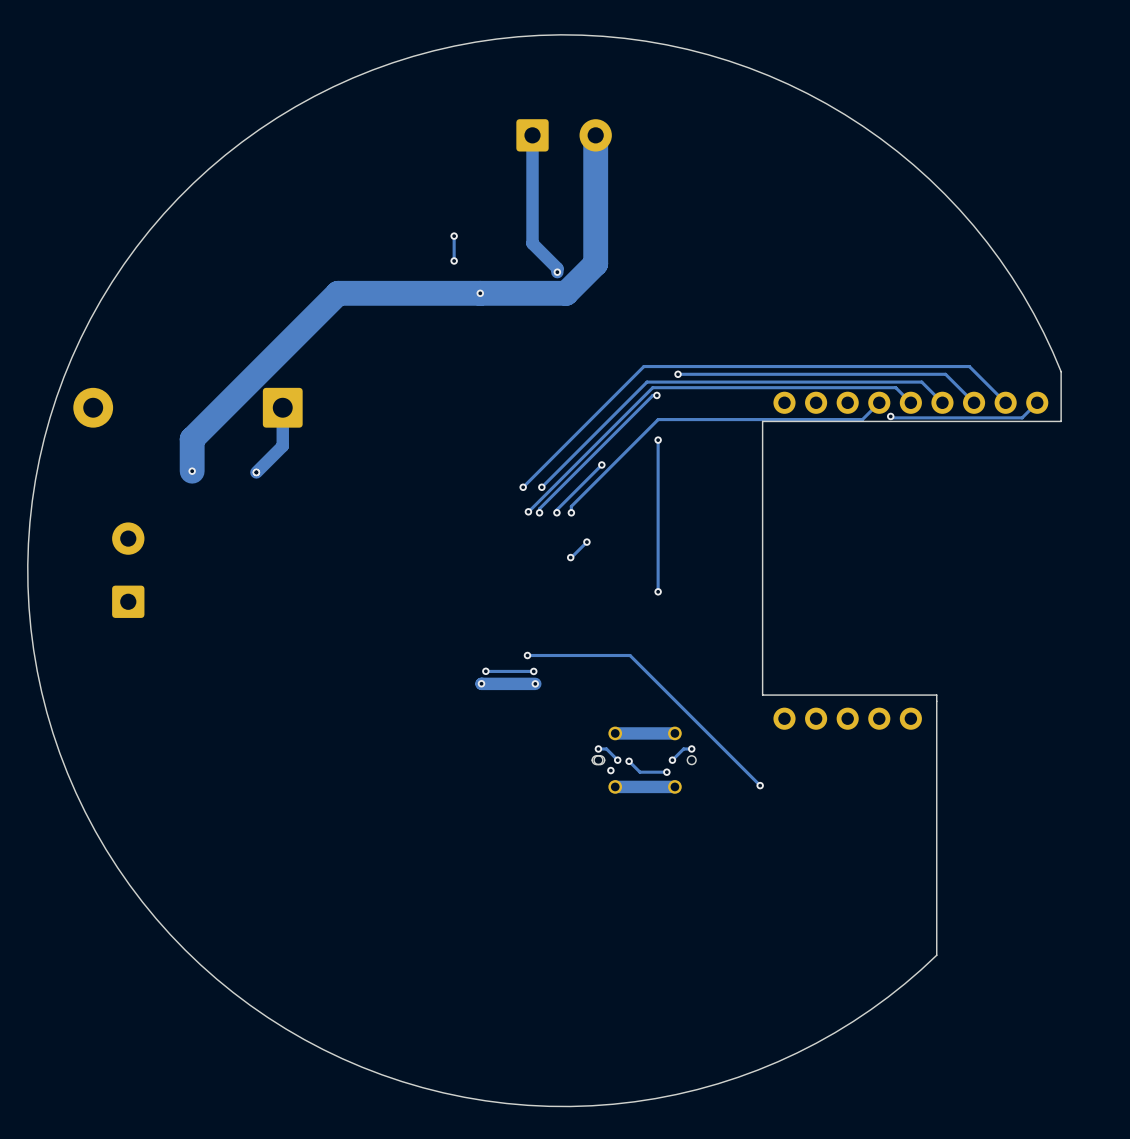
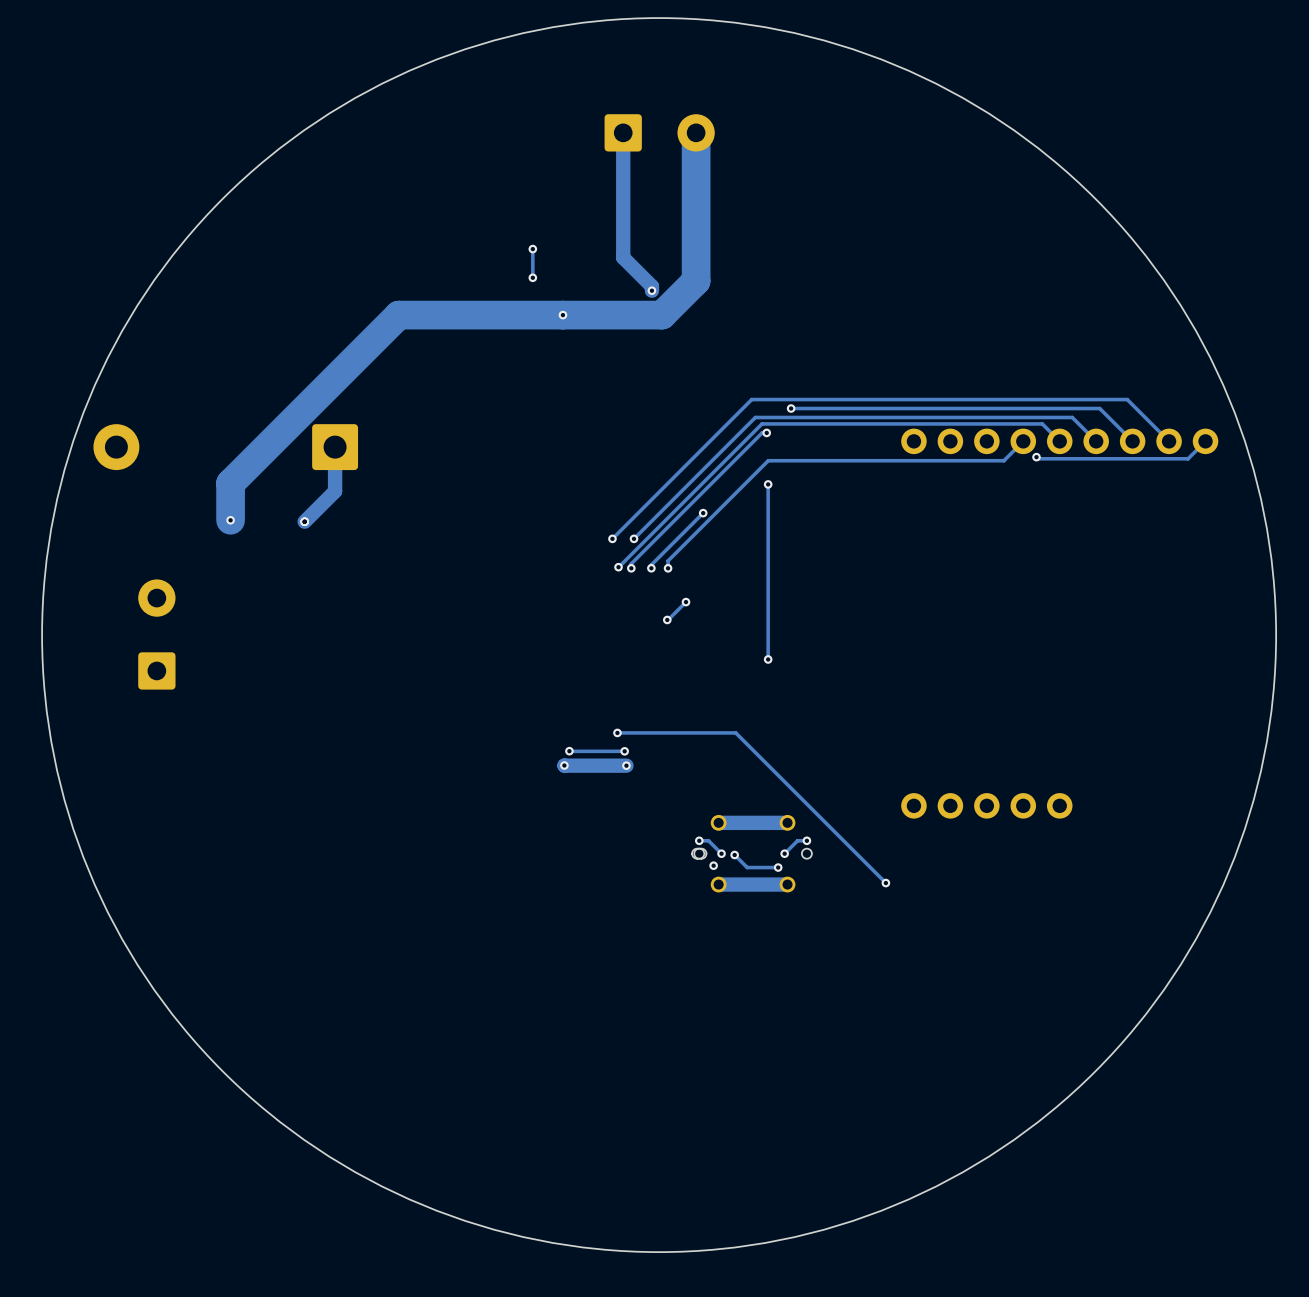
round board edge: none -> [41, 17, 1277, 1253]
board edge: (1061, 371) (1061, 421) (762, 421) (762, 695) (936, 695) (936, 955) (888, 997) (853, 1021) (797, 1052) (758, 1069) (717, 1083) (655, 1098) (613, 1104) (549, 1106) (506, 1103) (464, 1097) (402, 1081) (362, 1067) (323, 1049) (267, 1017) (216, 978) (185, 950) (156, 918) (117, 867) (95, 831) (67, 773) (53, 733) (37, 671) (29, 607) (27, 564) (29, 522) (35, 479) (50, 417) (63, 377) (90, 318) (112, 282) (136, 247) (178, 198) (209, 168) (259, 129) (314, 96) (352, 78) (392, 62) (454, 46) (496, 39) (560, 34) (603, 36) (666, 44) (728, 60) (768, 75) (826, 103) (862, 126) (897, 151) (944, 194) (973, 225) (1011, 277) (1033, 313) (1061, 371) -> none

